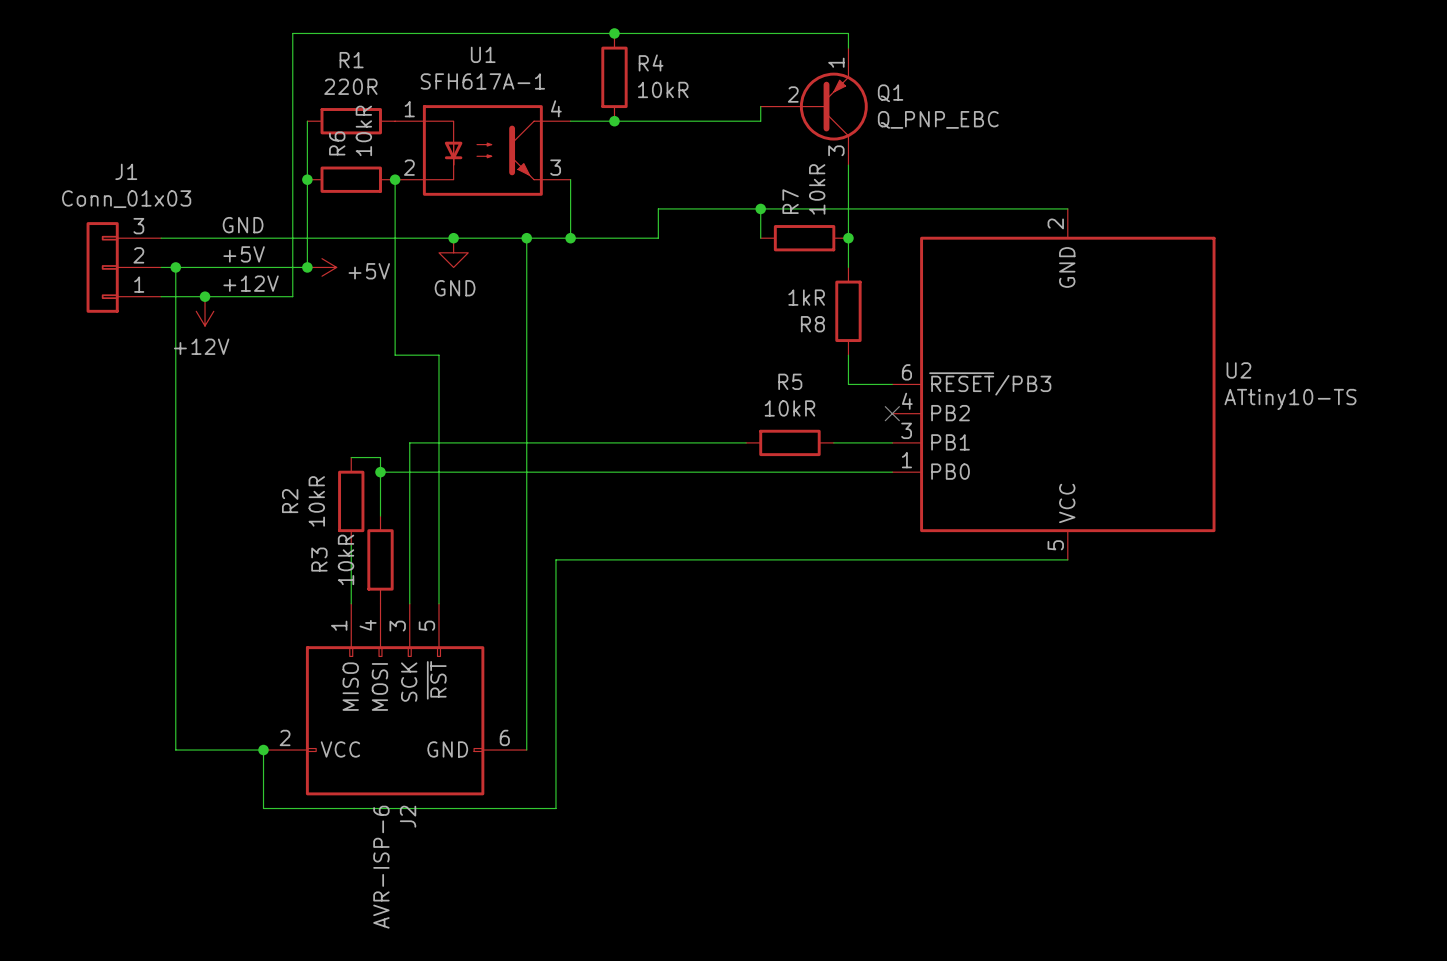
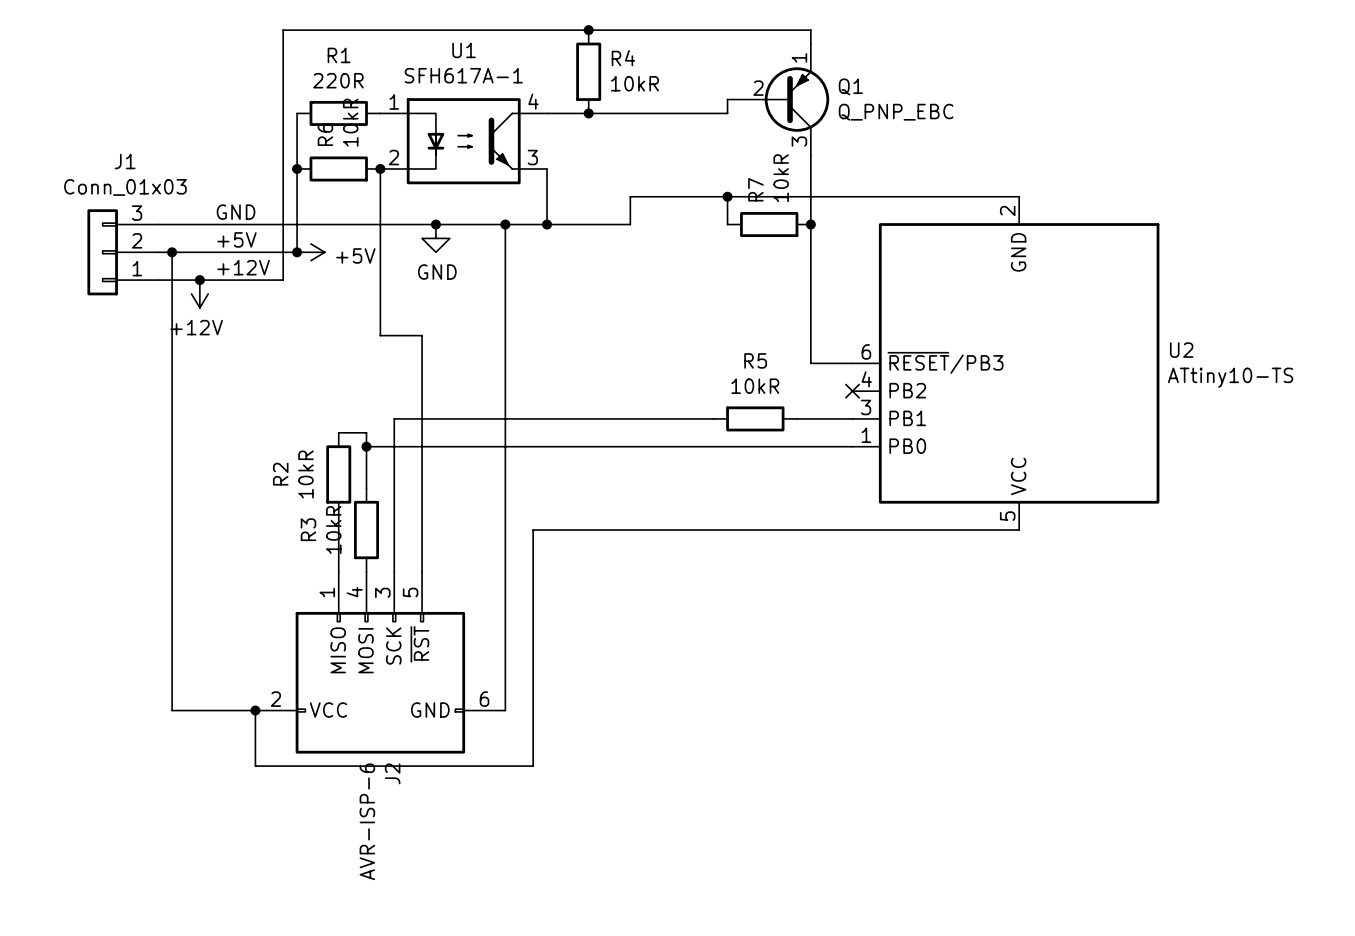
wire: none -> (810, 252) (810, 335)
R8: 1kR (848, 311) -> none

